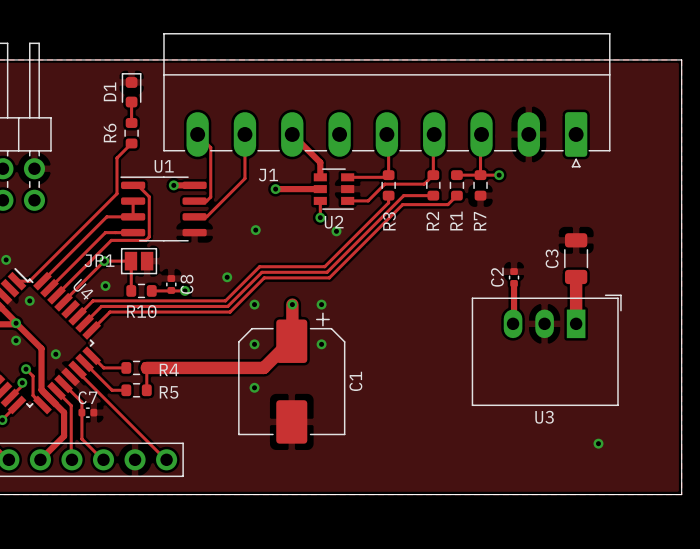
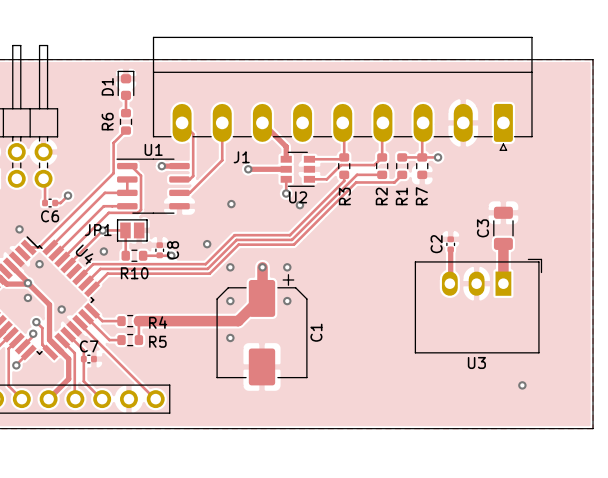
track: none -> (44, 179) (45, 200)
track: none -> (68, 195) (60, 203) (55, 203)
via: none -> (68, 195)
C6: none -> (50, 203)

